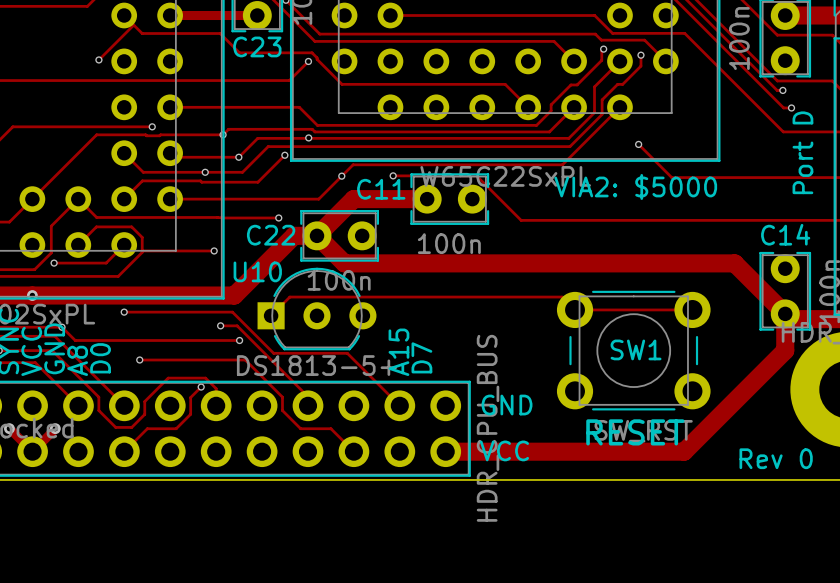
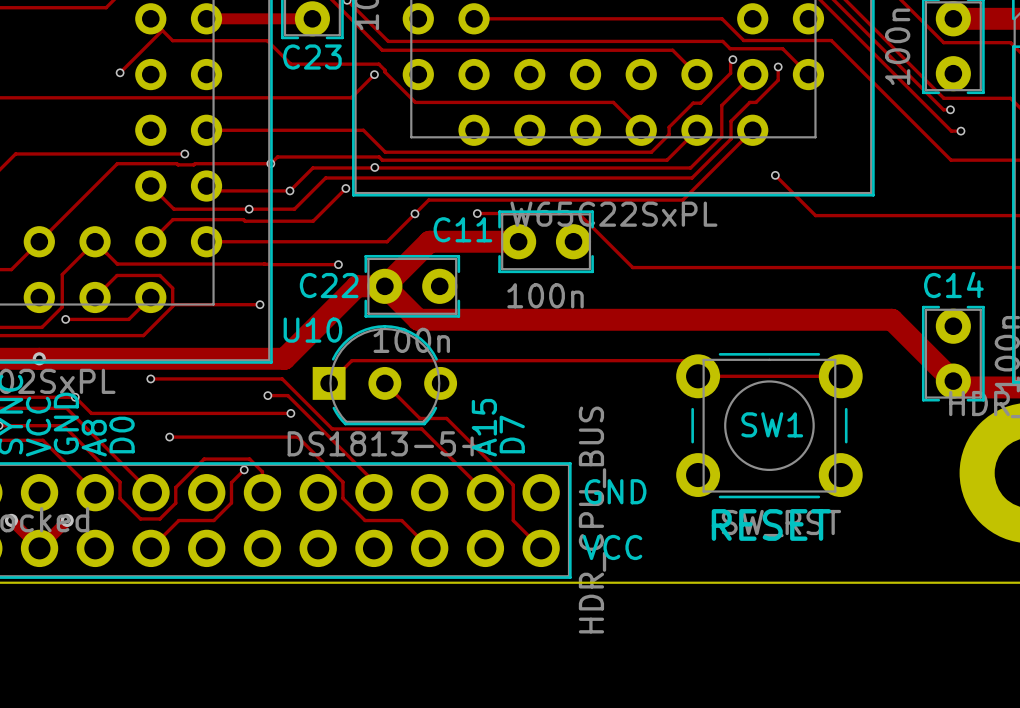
text: Port D (802, 152) -> none
text: VIA2: $5000 (635, 186) -> none
track: (785, 313) (785, 350) (684, 451) (445, 451) -> (384, 383) (419, 418) (446, 418) (513, 485) (513, 520) (541, 548)
text: Rev 0 (776, 458) -> none

